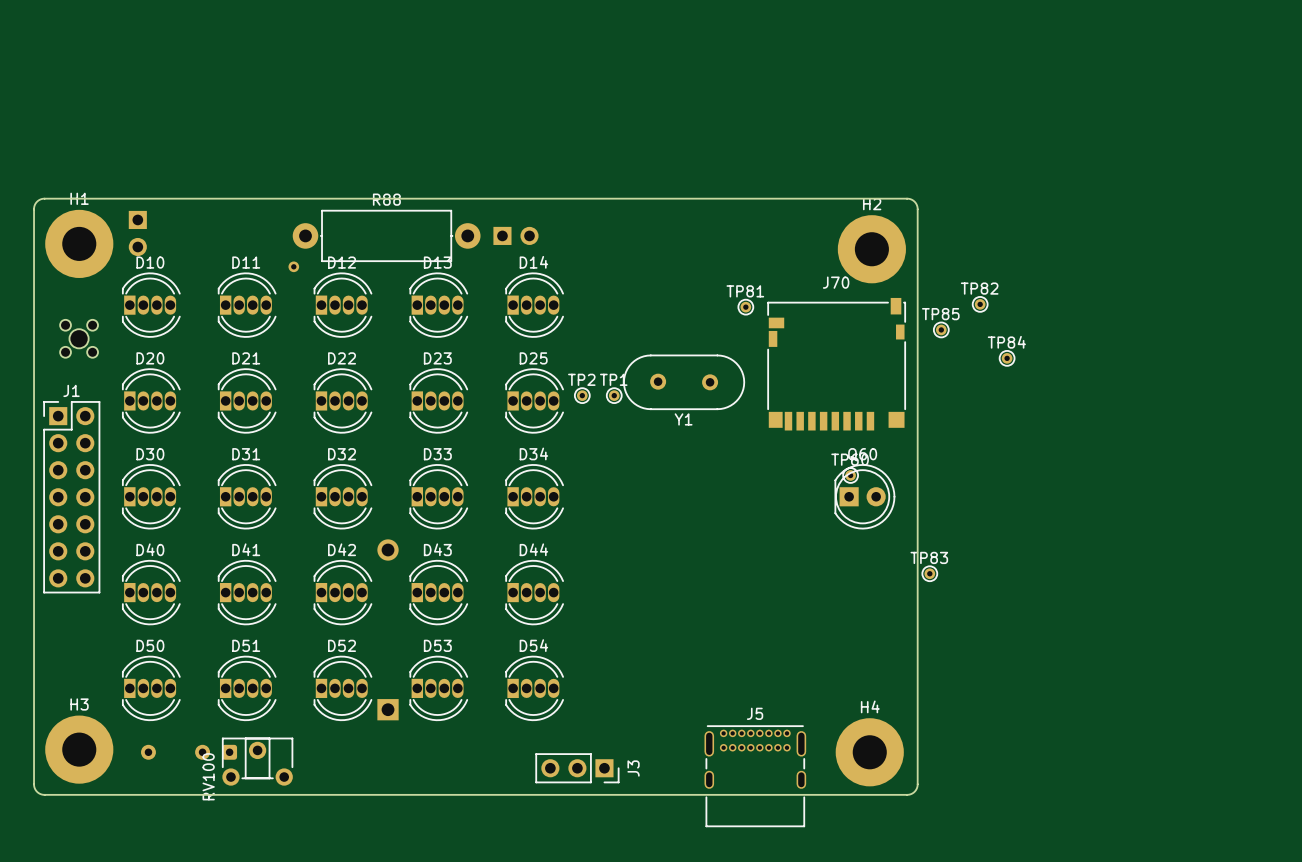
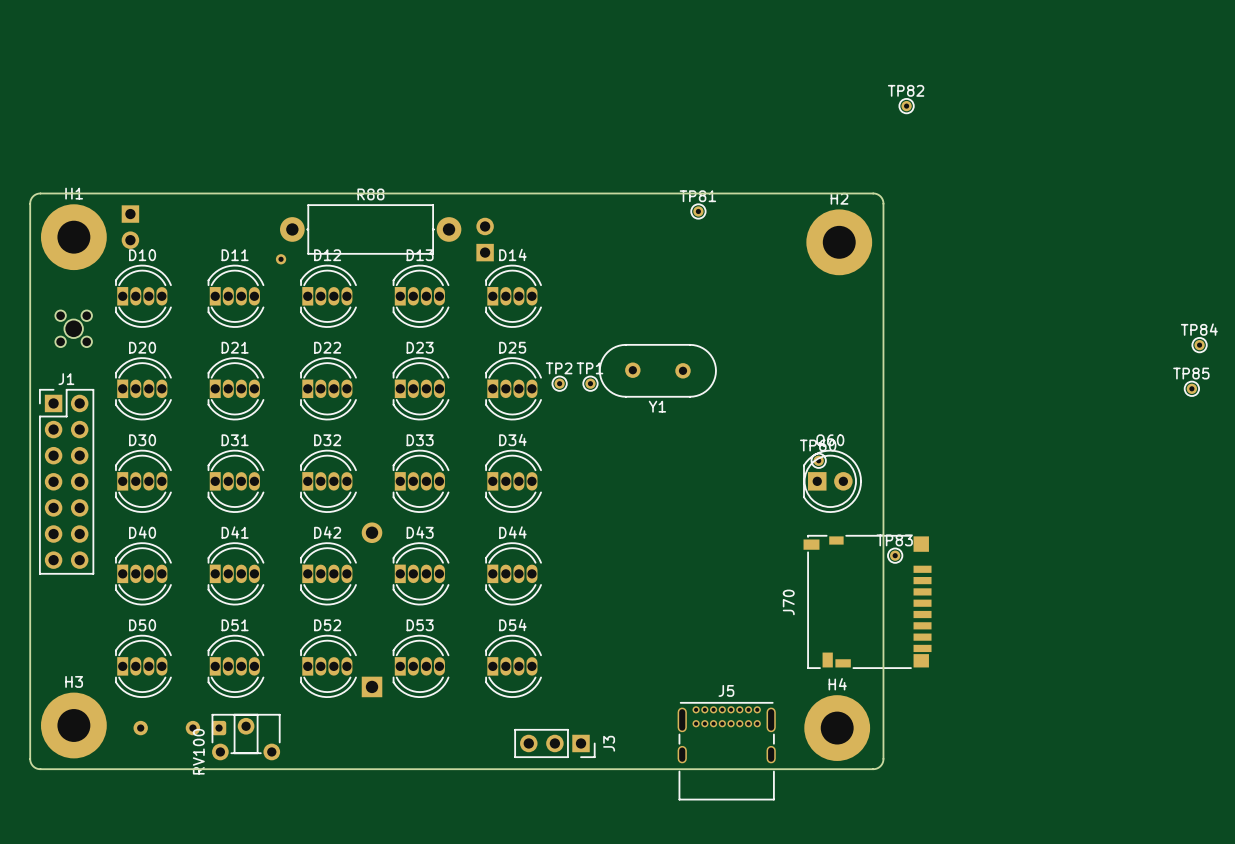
part rotation: 0° (515, 235) -> 90° counterclockwise (485, 239)
TP82 position: (980, 304) -> (906, 106)
TP81 position: (745, 307) -> (698, 211)
TP85 position: (941, 329) -> (1191, 388)
TP84 position: (1007, 358) -> (1199, 345)
J70 rotation: 0° (836, 364) -> 90° counterclockwise (867, 601)
J70 position: (836, 364) -> (867, 601)

